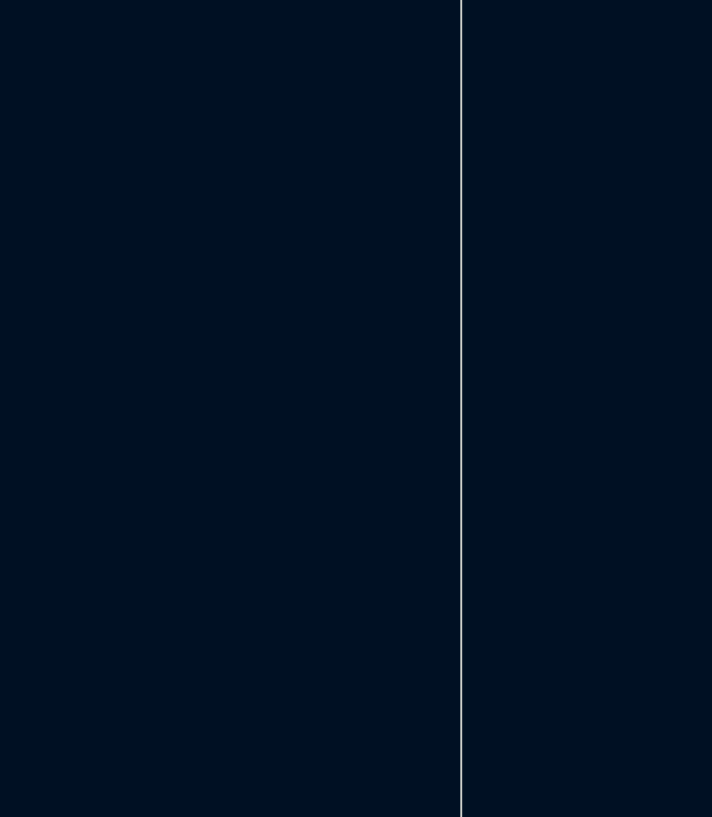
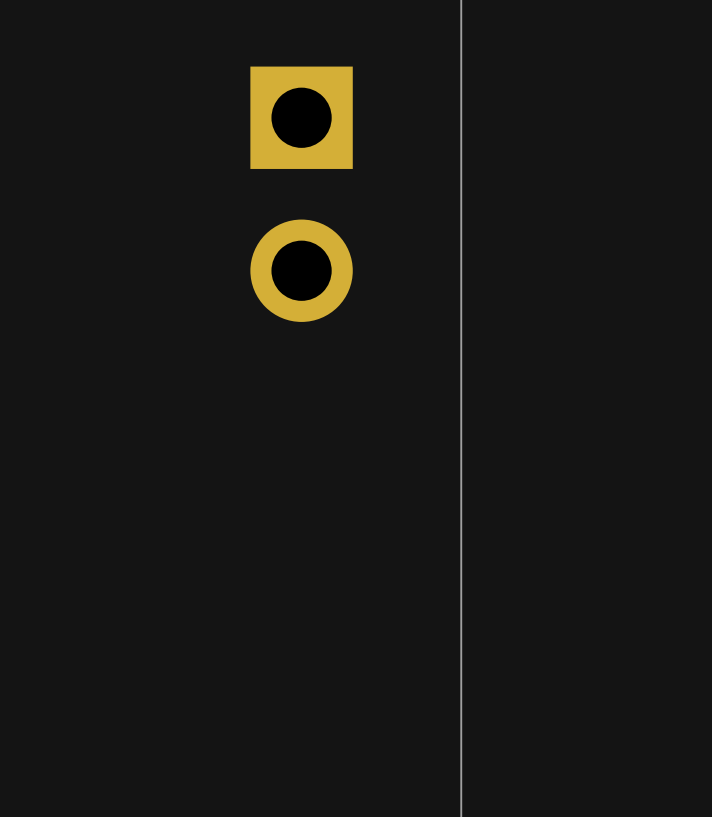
part: none -> (301, 194)

